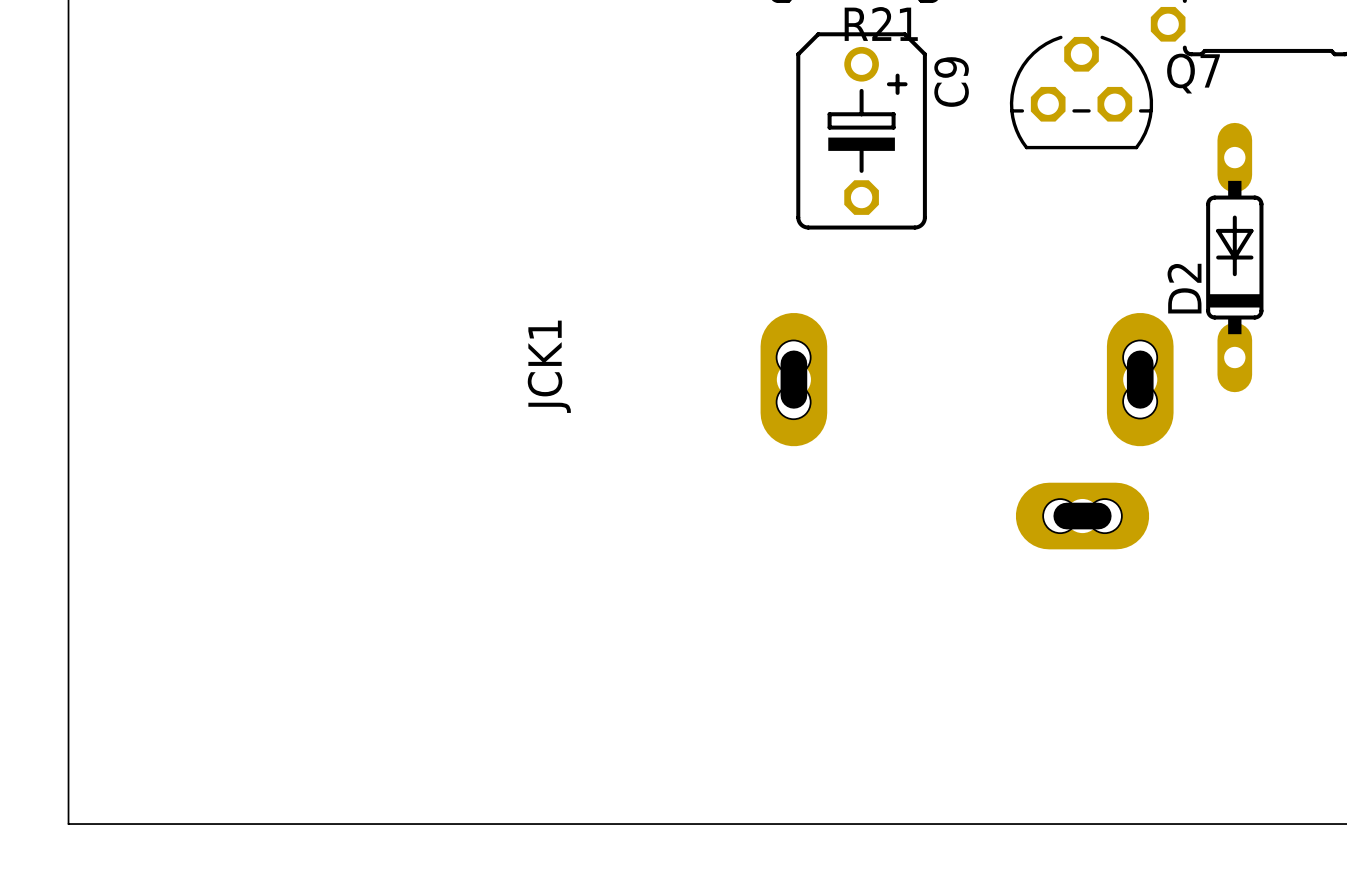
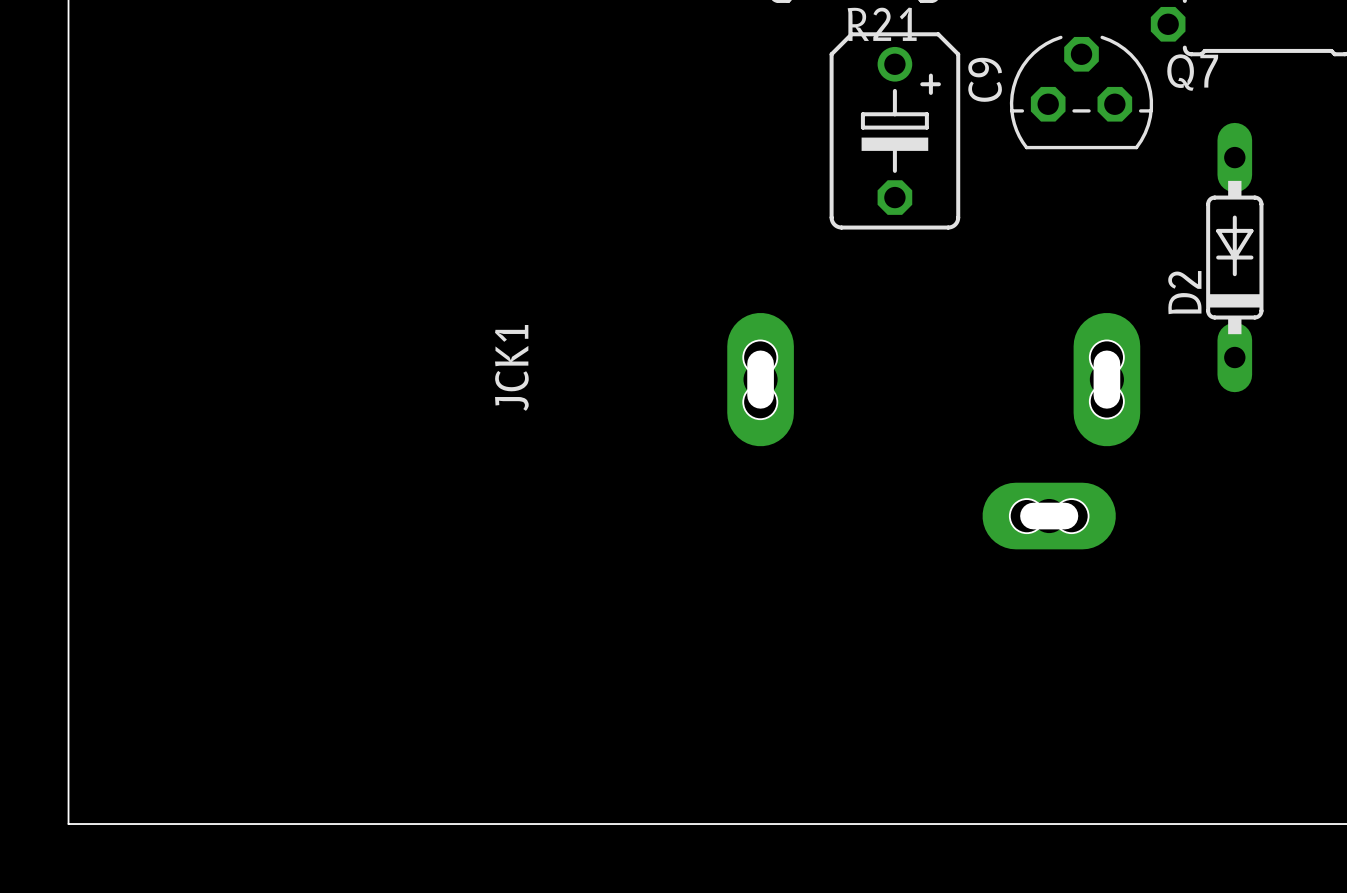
C9 position: (861, 130) -> (894, 130)
JCK1 position: (967, 431) -> (933, 431)

